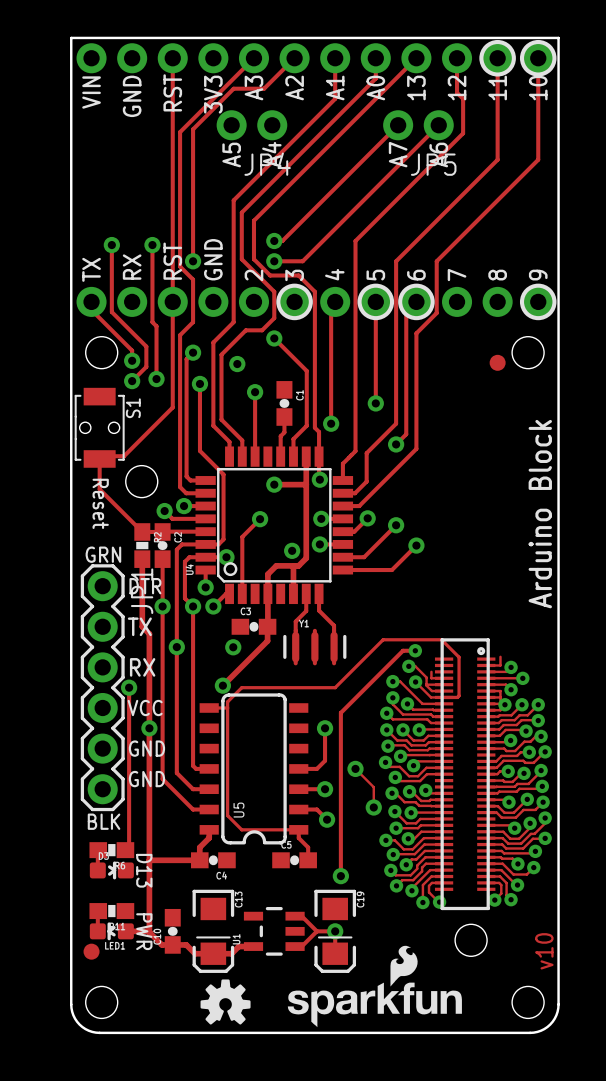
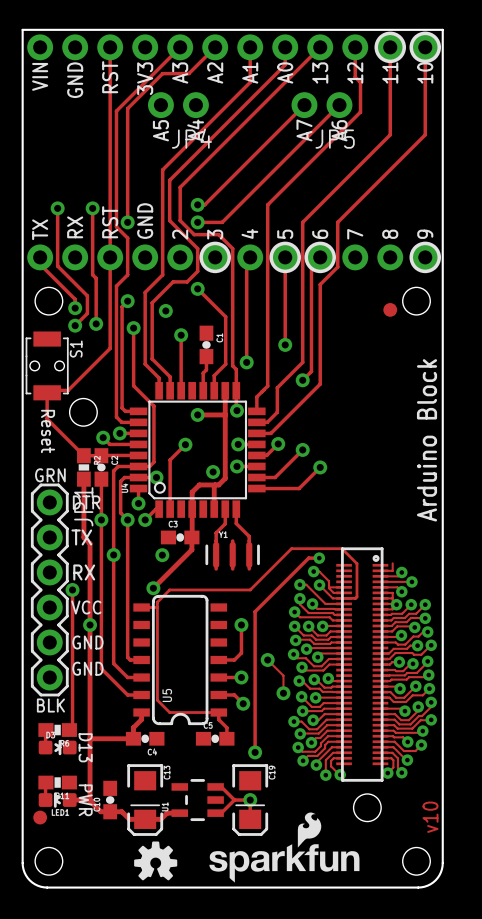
track: (431, 671) (431, 678) (444, 678) -> none

